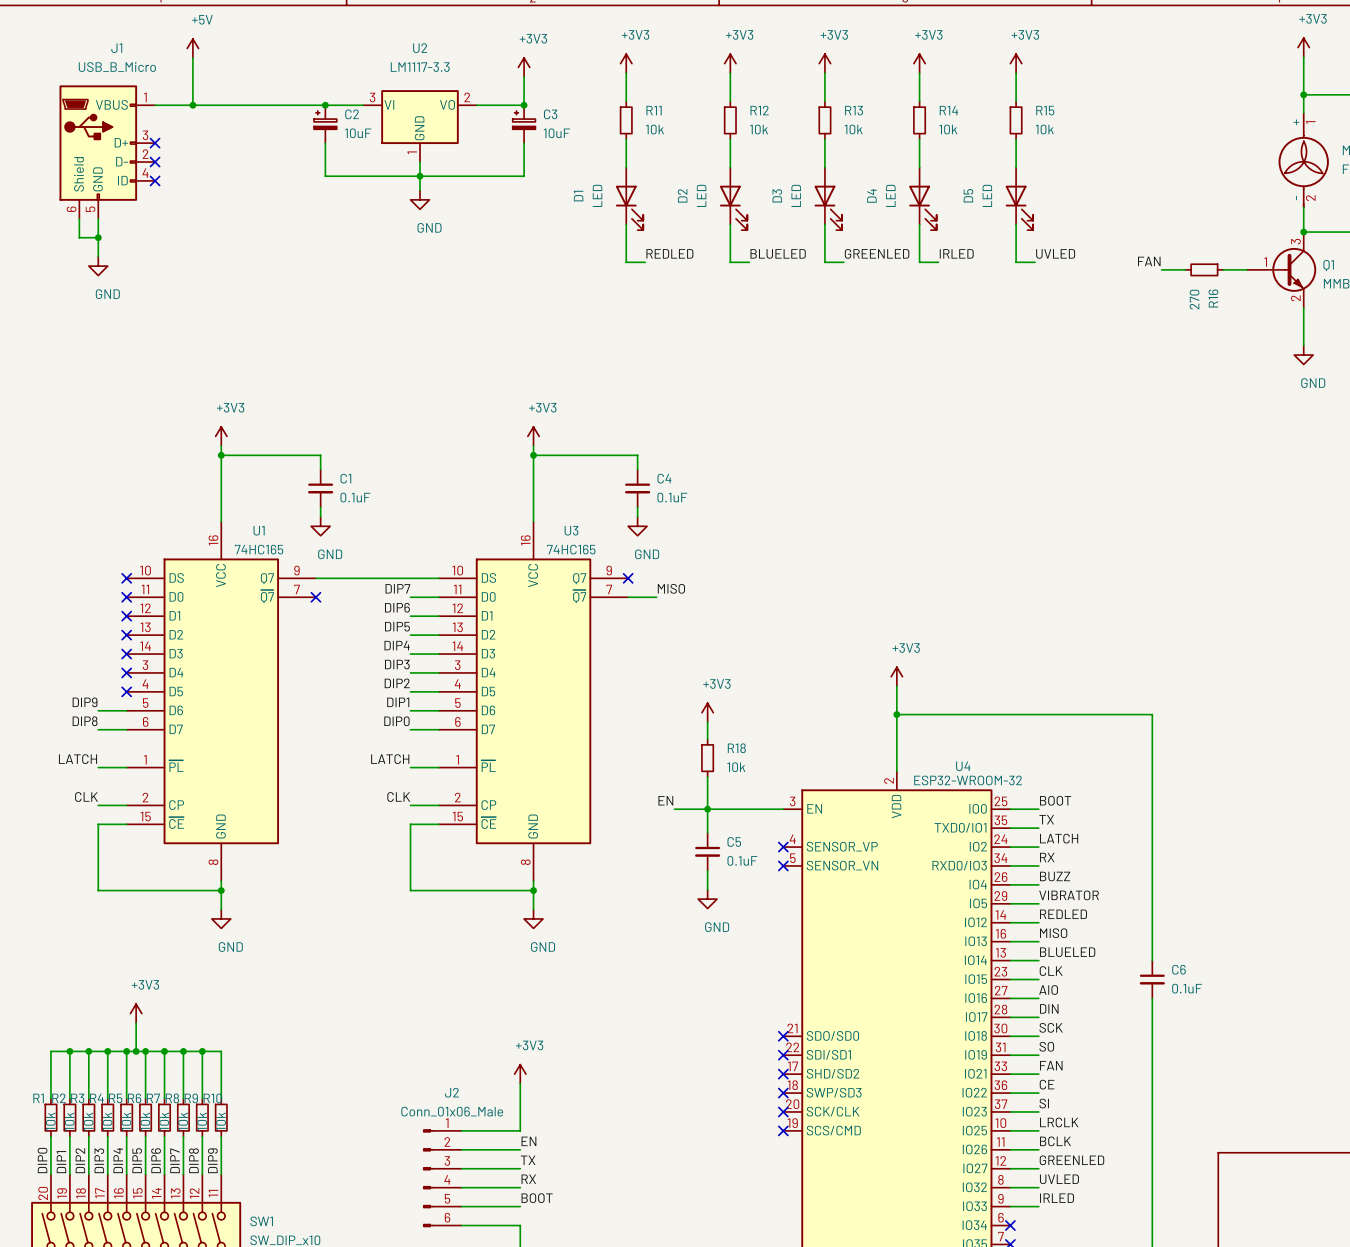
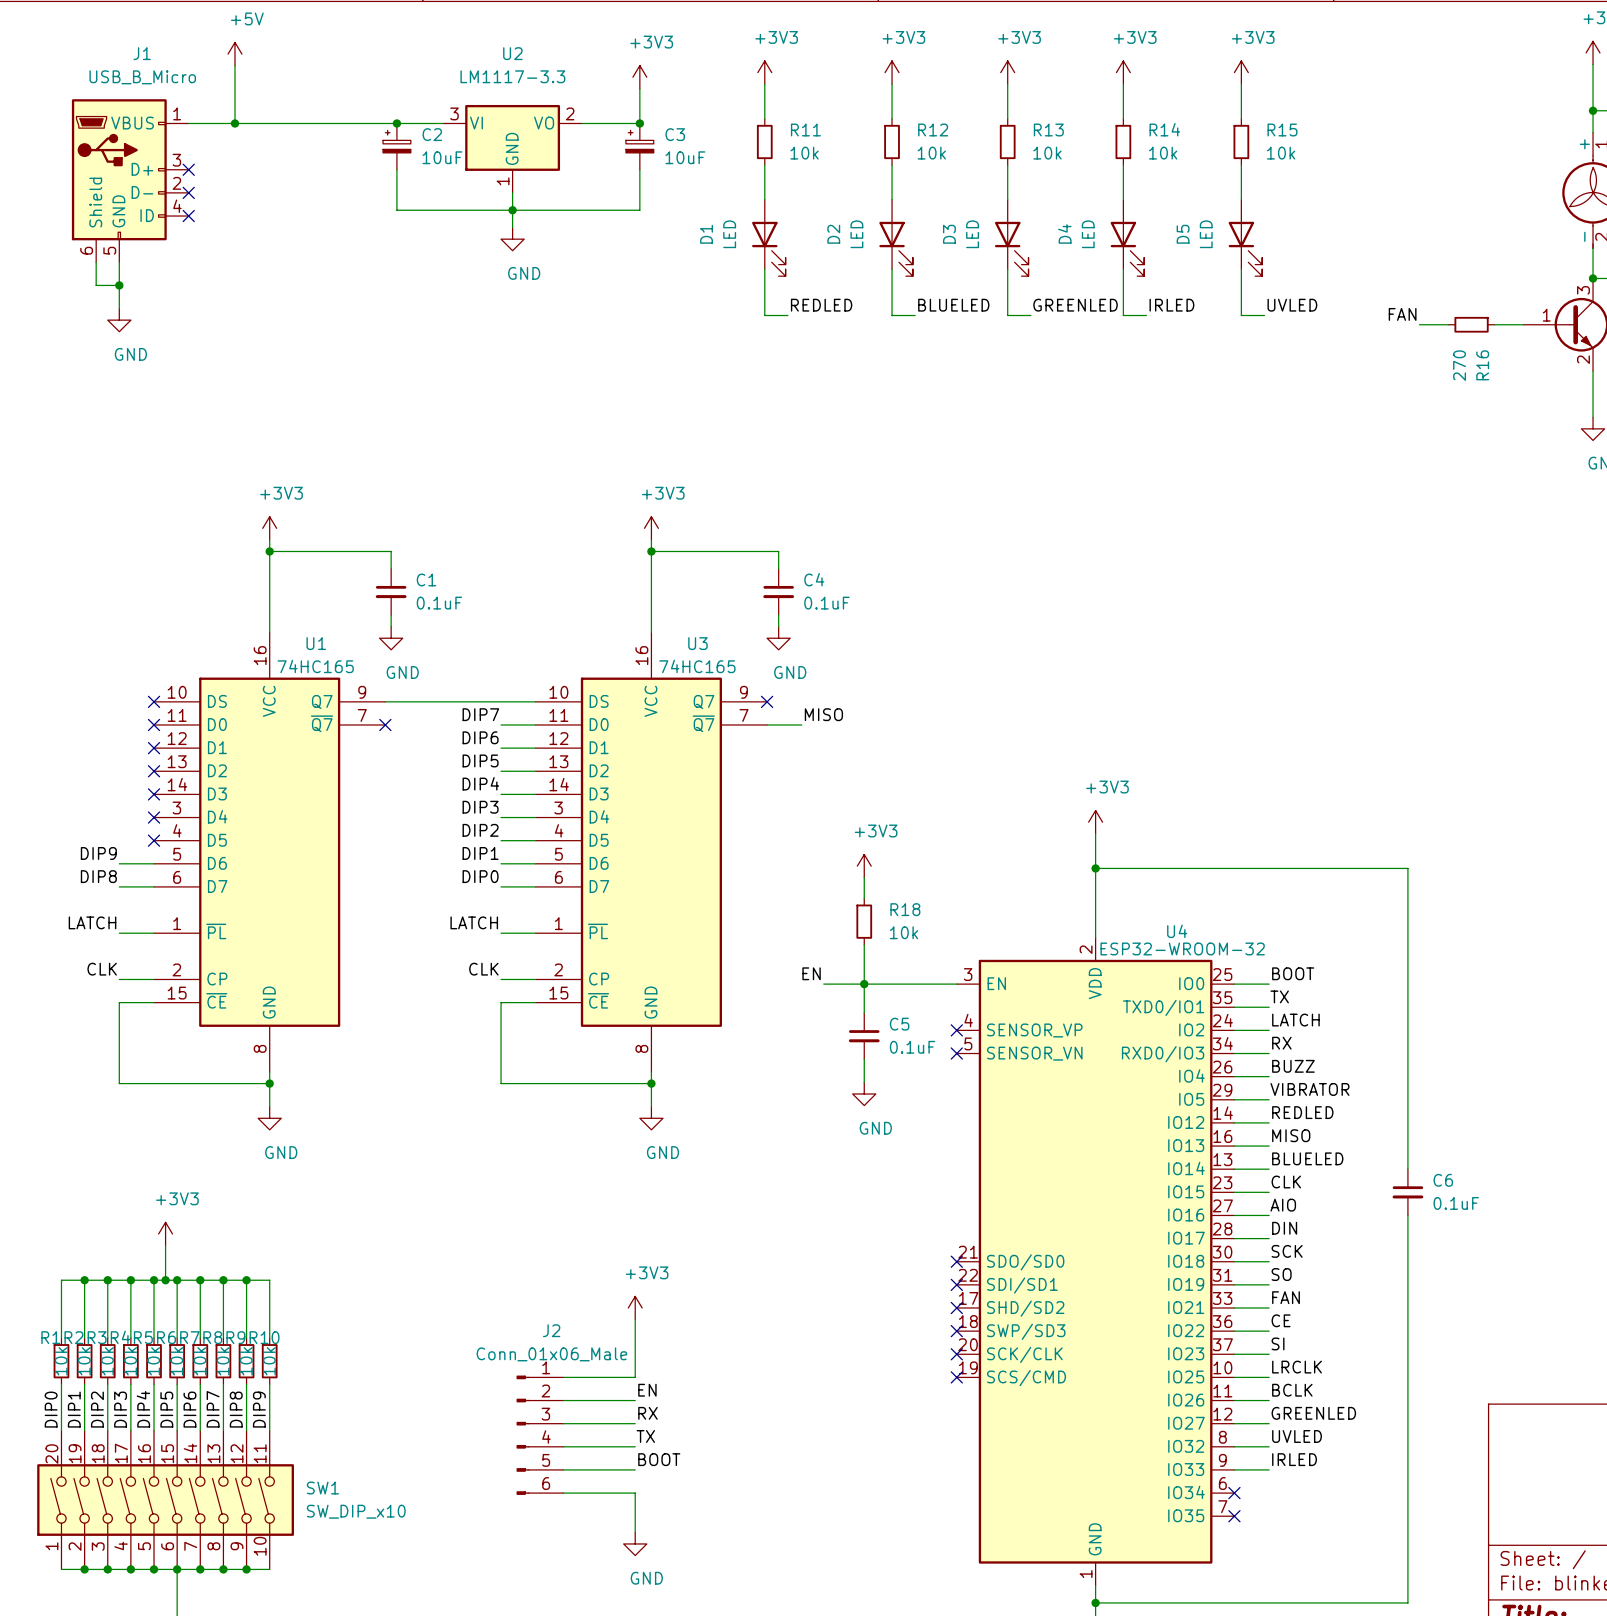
label: TX (528, 1160) -> RX (647, 1413)
label: RX (528, 1179) -> TX (645, 1436)

